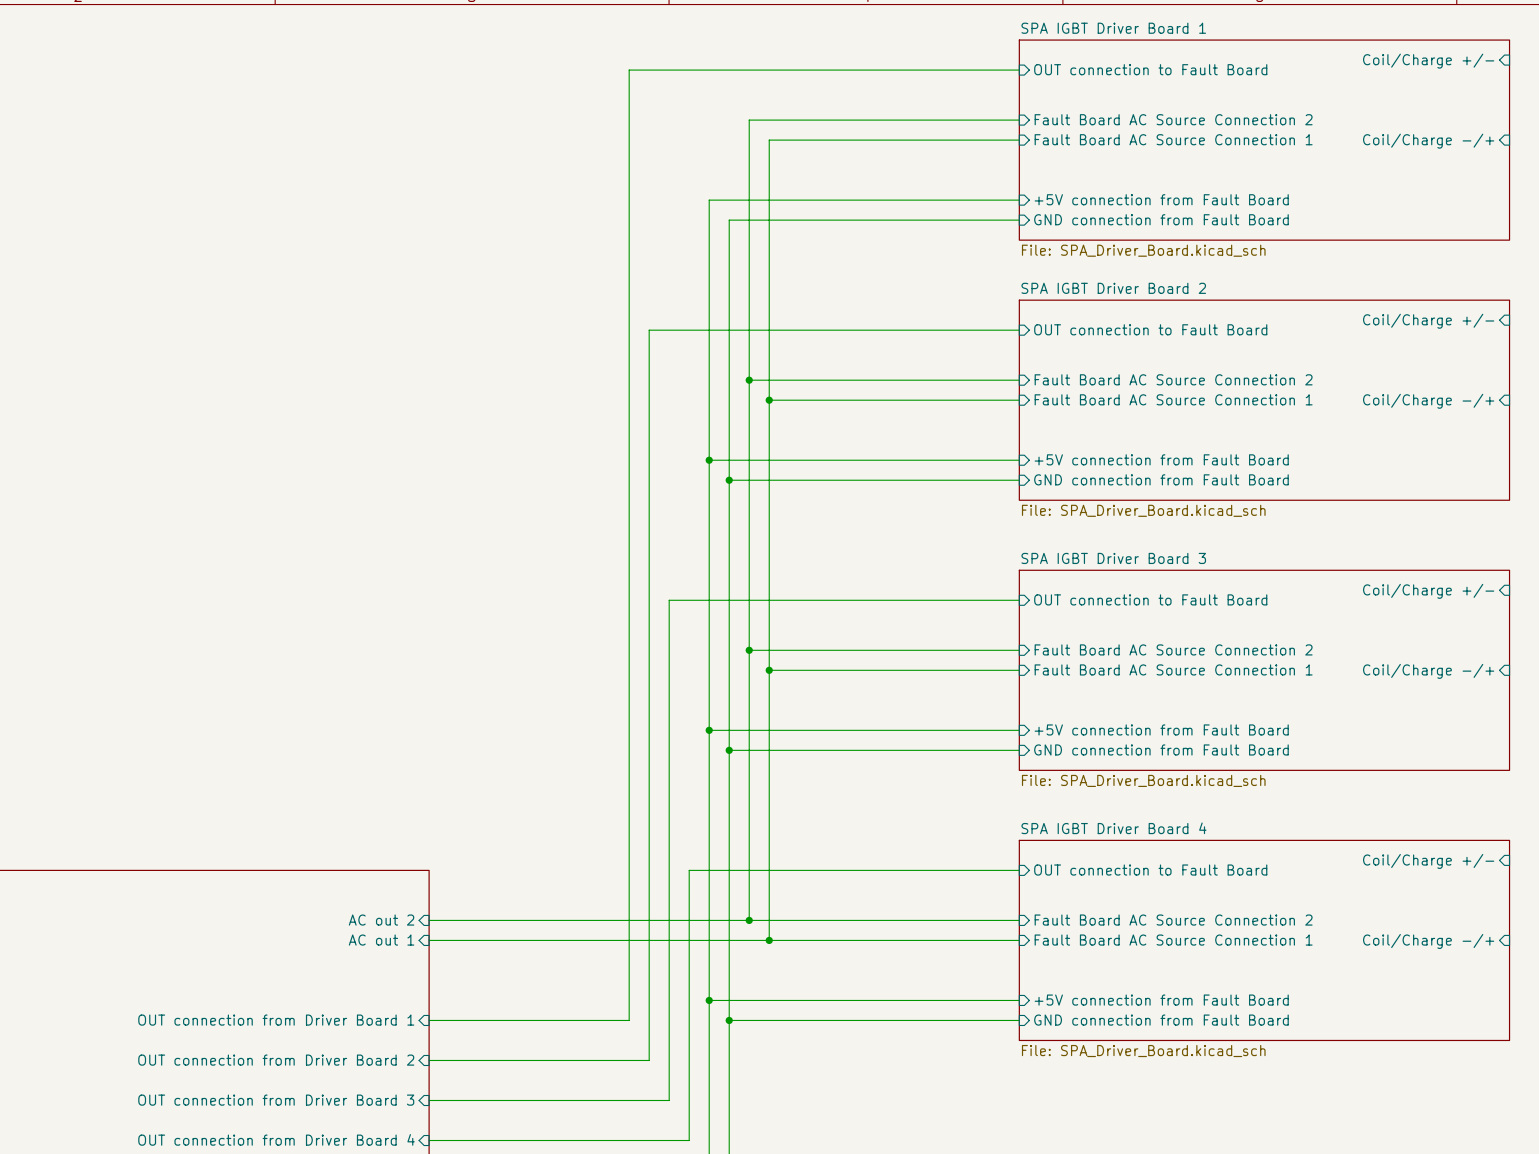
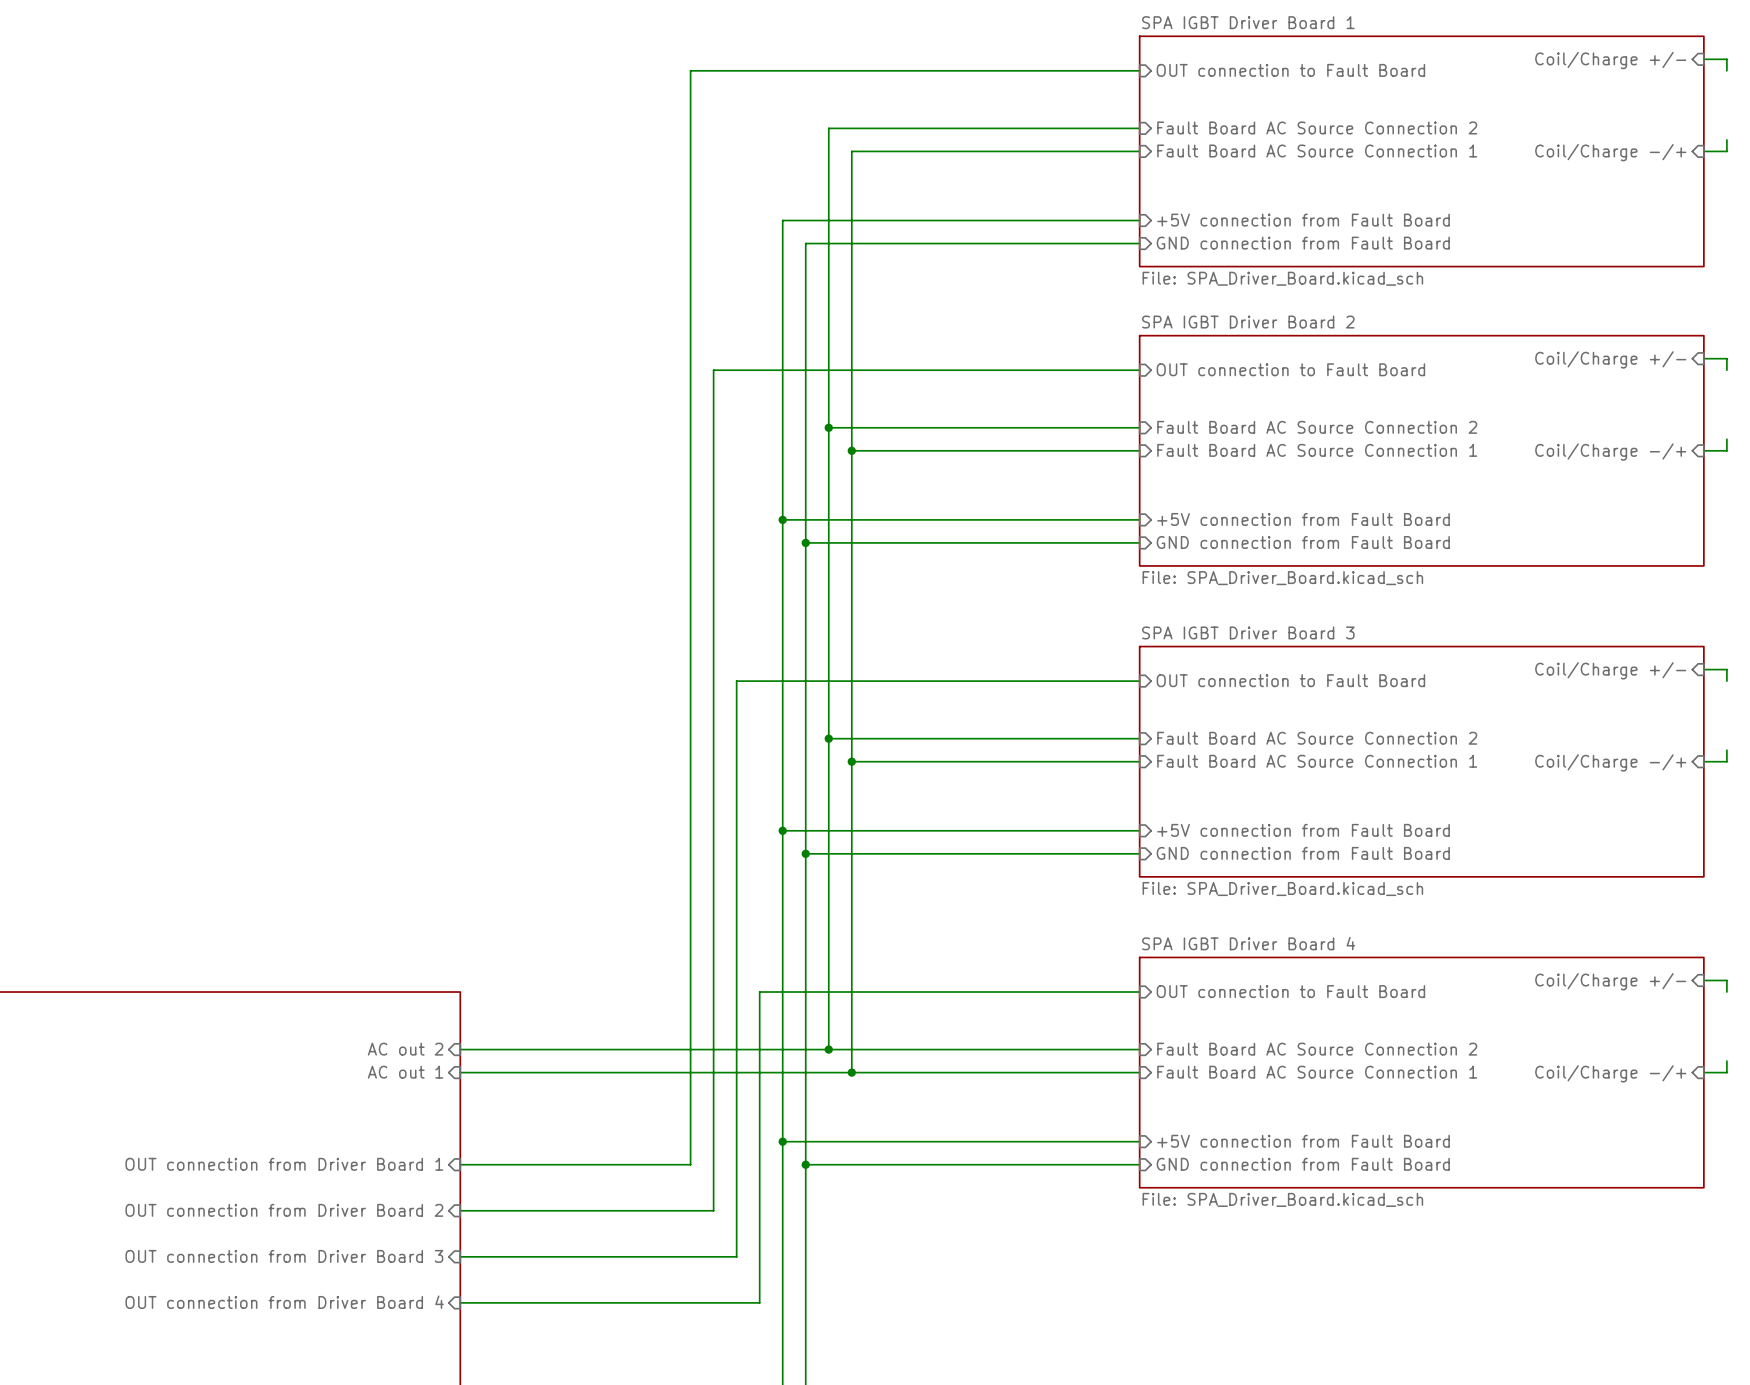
wire: none -> (1703, 59) (1726, 59) (1726, 70)
wire: none -> (1726, 139) (1726, 151) (1703, 151)
wire: none -> (1703, 358) (1726, 358) (1726, 370)
wire: none -> (1726, 439) (1726, 450) (1703, 450)
wire: none -> (1703, 669) (1726, 669) (1726, 681)
wire: none -> (1726, 750) (1726, 761) (1703, 761)
wire: none -> (1703, 980) (1726, 980) (1726, 992)
wire: none -> (1726, 1061) (1726, 1072) (1703, 1072)

